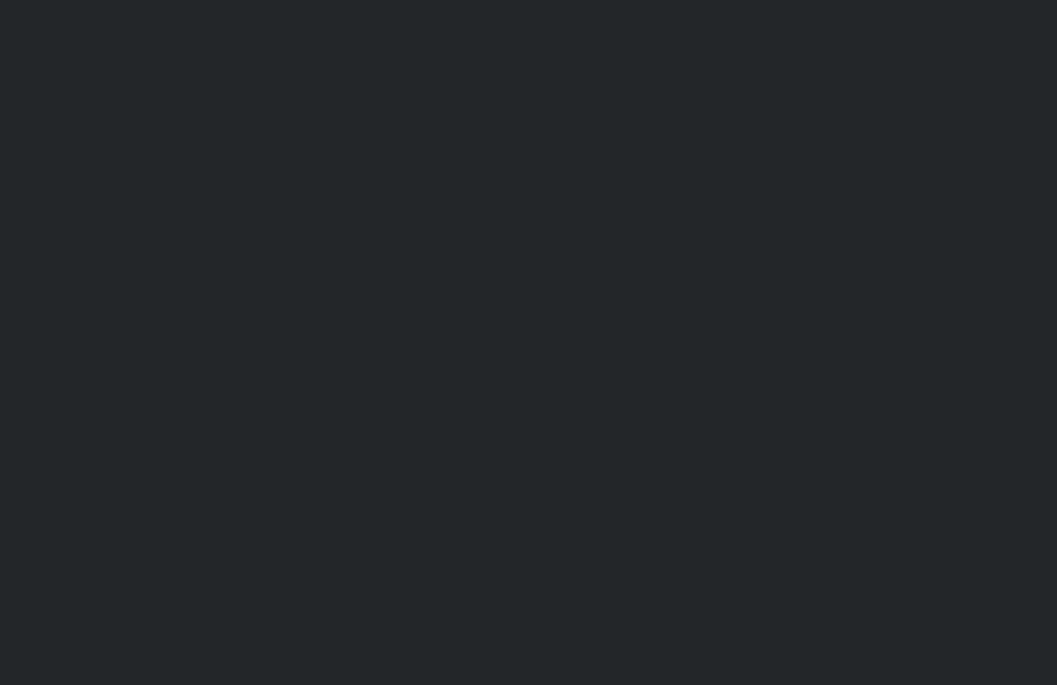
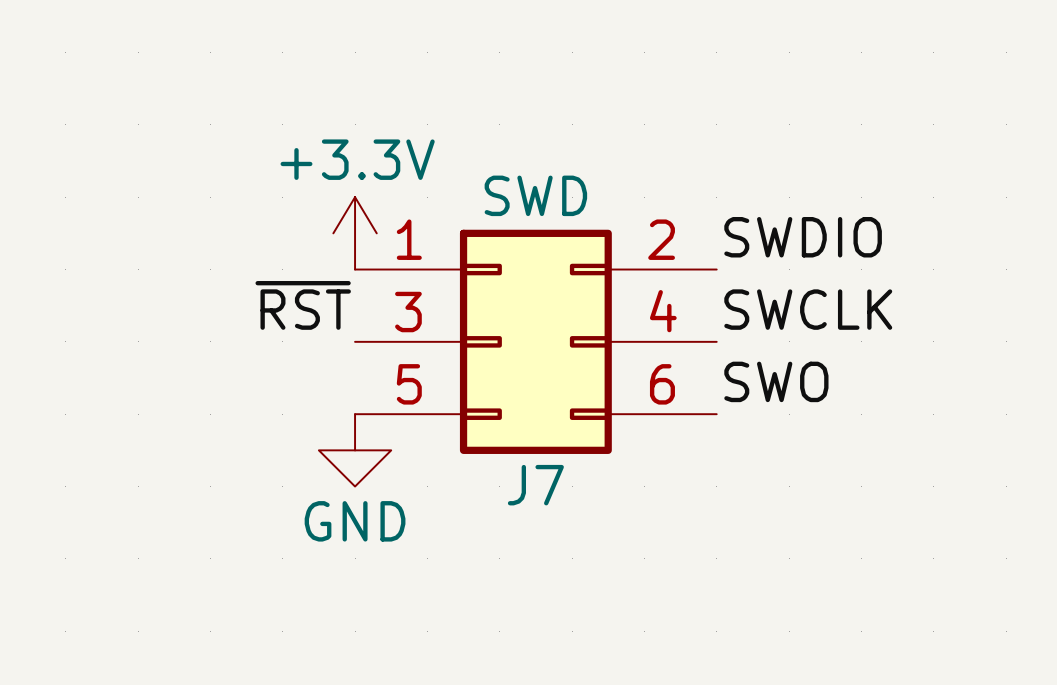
power symbol: none -> +3.3V (355, 233)
label: none -> SWDIO (803, 237)
label: none -> ~{RST} (303, 305)
label: none -> SWCLK (808, 309)
J7: none -> SWD (535, 341)
label: none -> SWO (776, 381)
power symbol: none -> GND (355, 450)

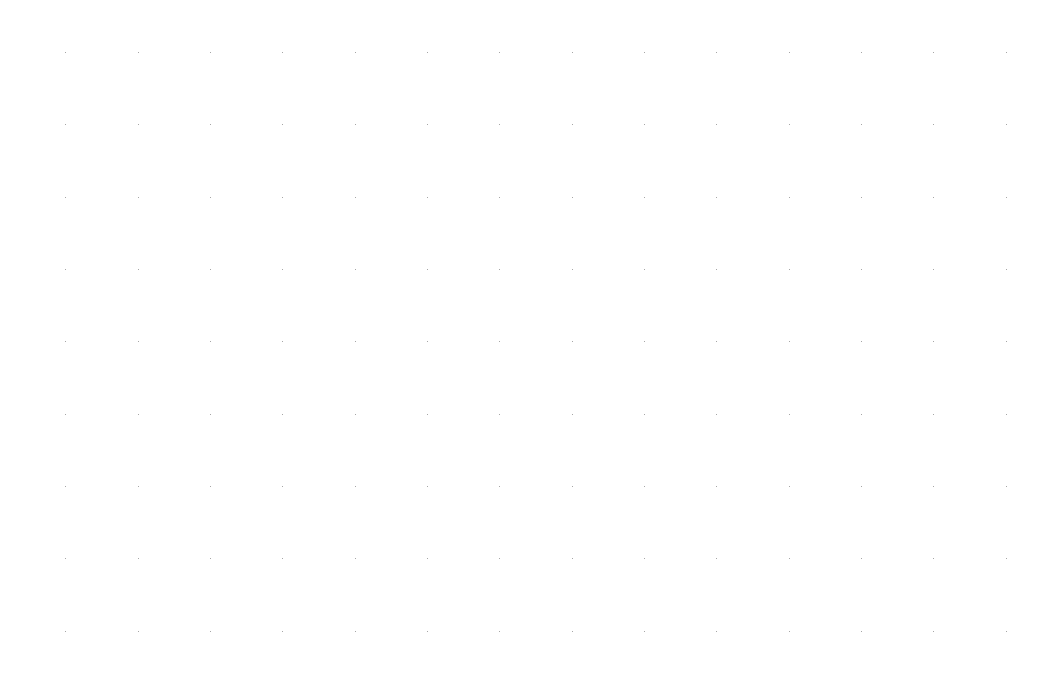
power symbol: +3.3V (355, 233) -> none
label: SWDIO (803, 237) -> none
label: ~{RST} (303, 305) -> none
label: SWCLK (808, 309) -> none
J7: SWD (535, 341) -> none
label: SWO (776, 381) -> none
power symbol: GND (355, 450) -> none

